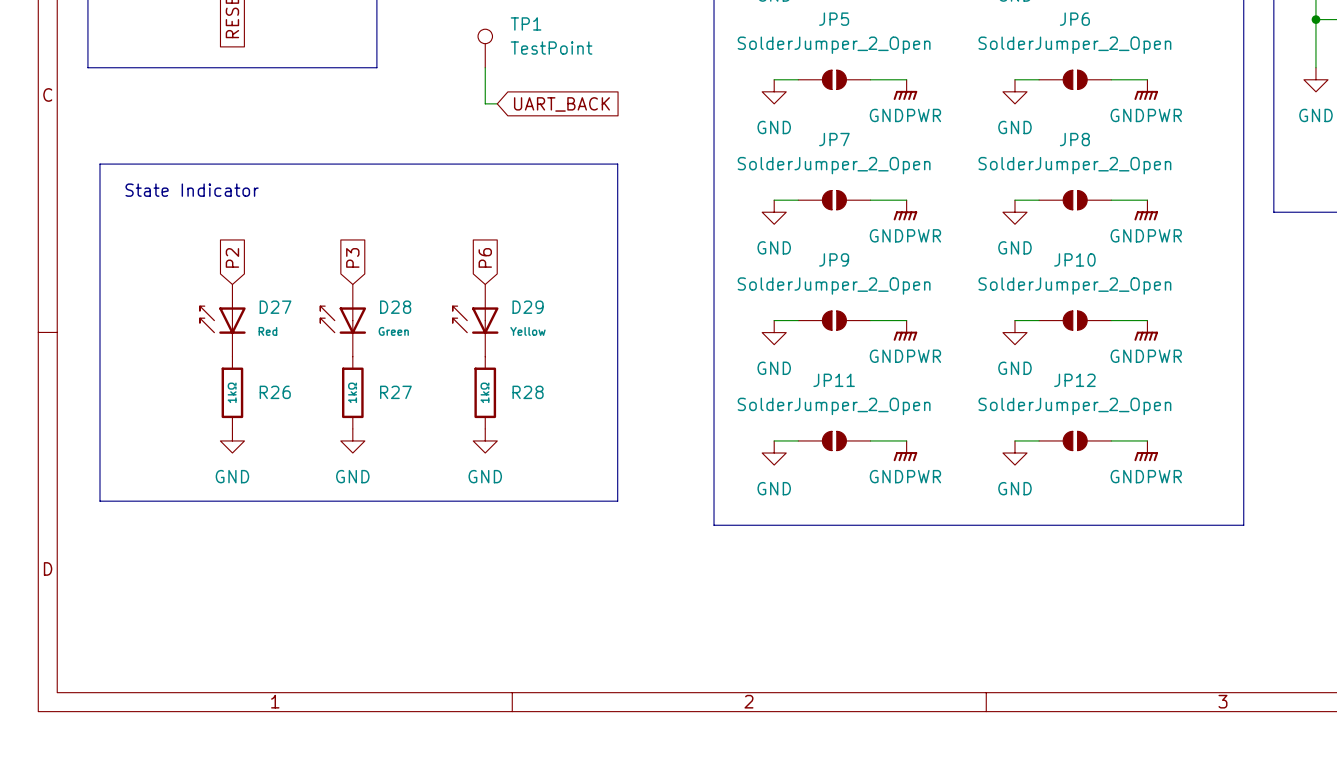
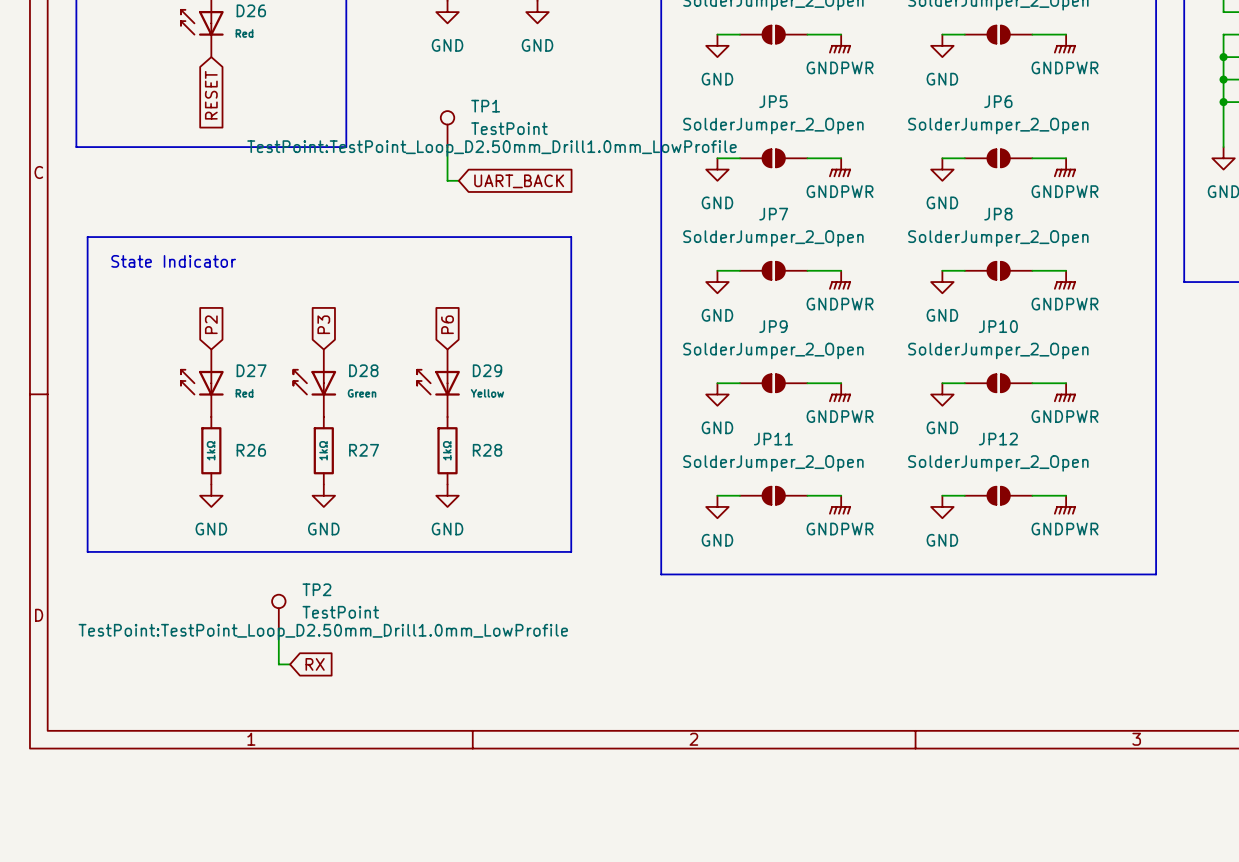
TP1 text: none -> TestPoint:TestPoint_Loop_D2.50mm_Drill1.0mm_LowProfile (491, 148)
TP2: none -> TestPoint (278, 612)
wire: none -> (278, 630) (278, 664) (290, 664)
global label: none -> RX (315, 664)

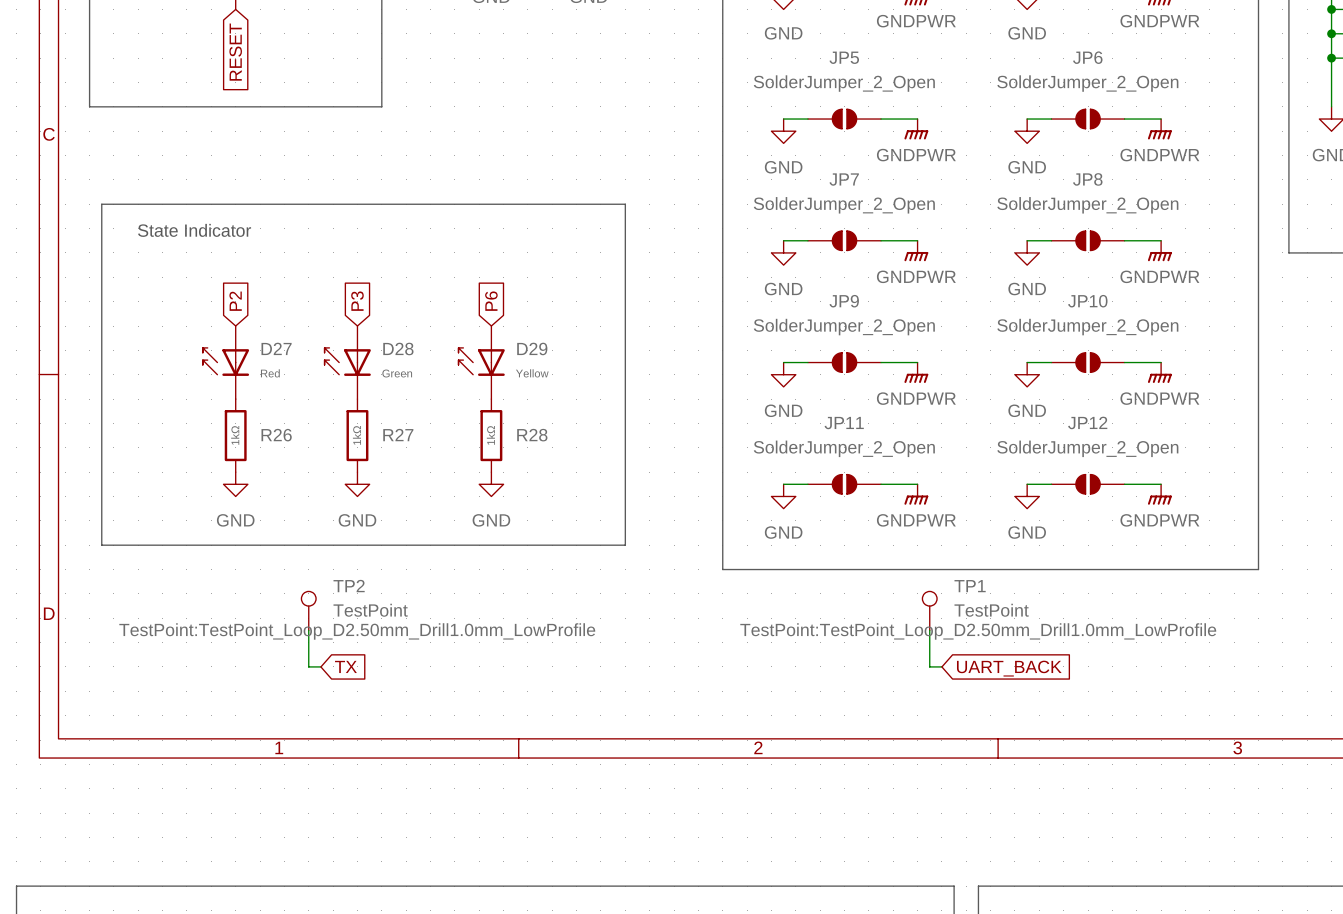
TP1 position: (447, 129) -> (929, 610)
wire: (447, 147) (447, 180) (458, 180) -> none
global label: UART_BACK (519, 181) -> none
wire: none -> (929, 630) (929, 666) (941, 666)
global label: RX (315, 664) -> TX (345, 666)
global label: none -> UART_BACK (1009, 668)

